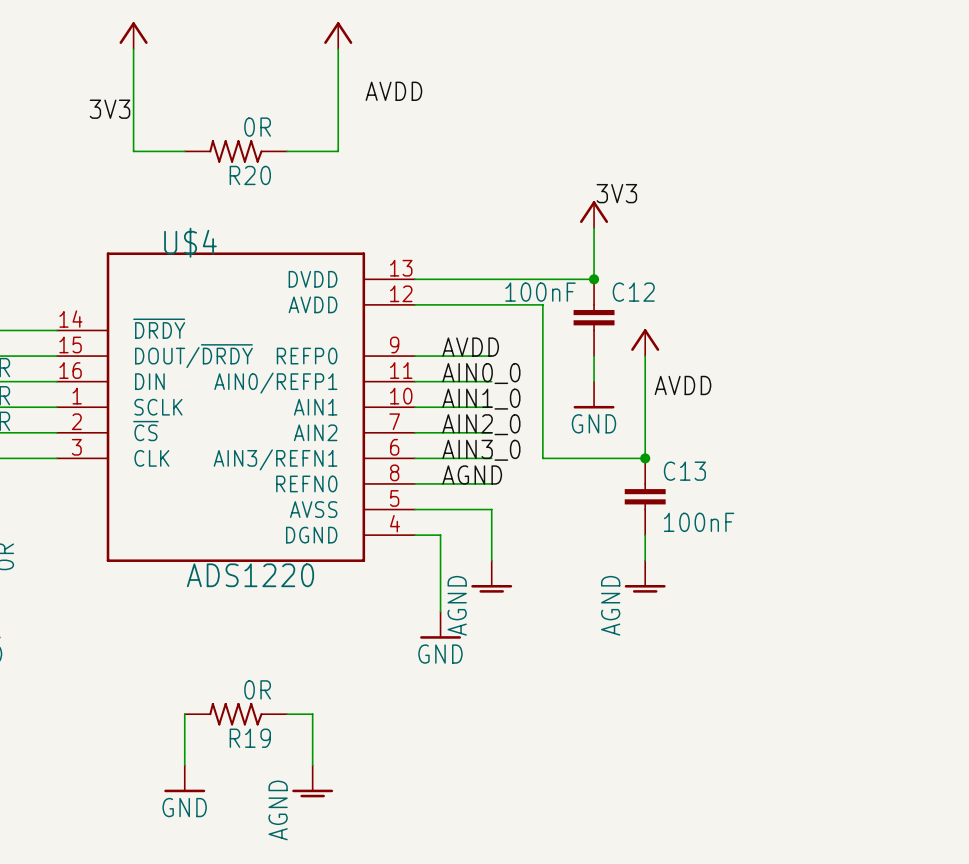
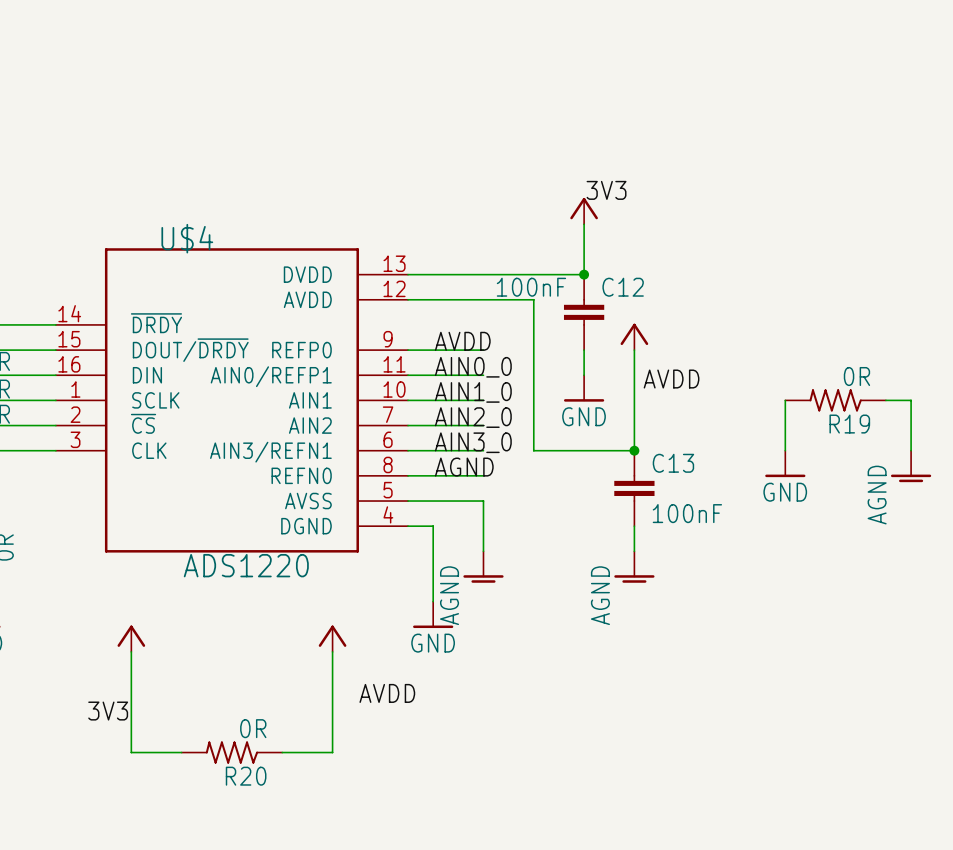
power symbol: (133, 35) -> none
power symbol: (338, 35) -> none
wire: (133, 49) (133, 151) (184, 151) -> none
wire: (338, 49) (338, 151) (287, 151) -> none
label: AVDD (393, 91) -> none
label: 3V3 (110, 109) -> none
R20 position: (235, 151) -> (231, 752)
wire: none -> (785, 400) (785, 450)
wire: none -> (885, 400) (911, 400) (911, 450)
power symbol: none -> GND (785, 463)
power symbol: none -> AGND (911, 466)
power symbol: none -> (131, 638)
power symbol: none -> (332, 638)
wire: none -> (332, 651) (332, 752) (282, 752)
label: none -> AVDD (387, 693)
wire: (184, 714) (184, 765) -> (131, 651) (131, 752) (181, 752)
R19 position: (235, 714) -> (835, 400)
wire: (287, 714) (312, 714) (312, 765) -> none
label: none -> 3V3 (108, 711)
power symbol: GND (184, 778) -> none
power symbol: AGND (312, 781) -> none

